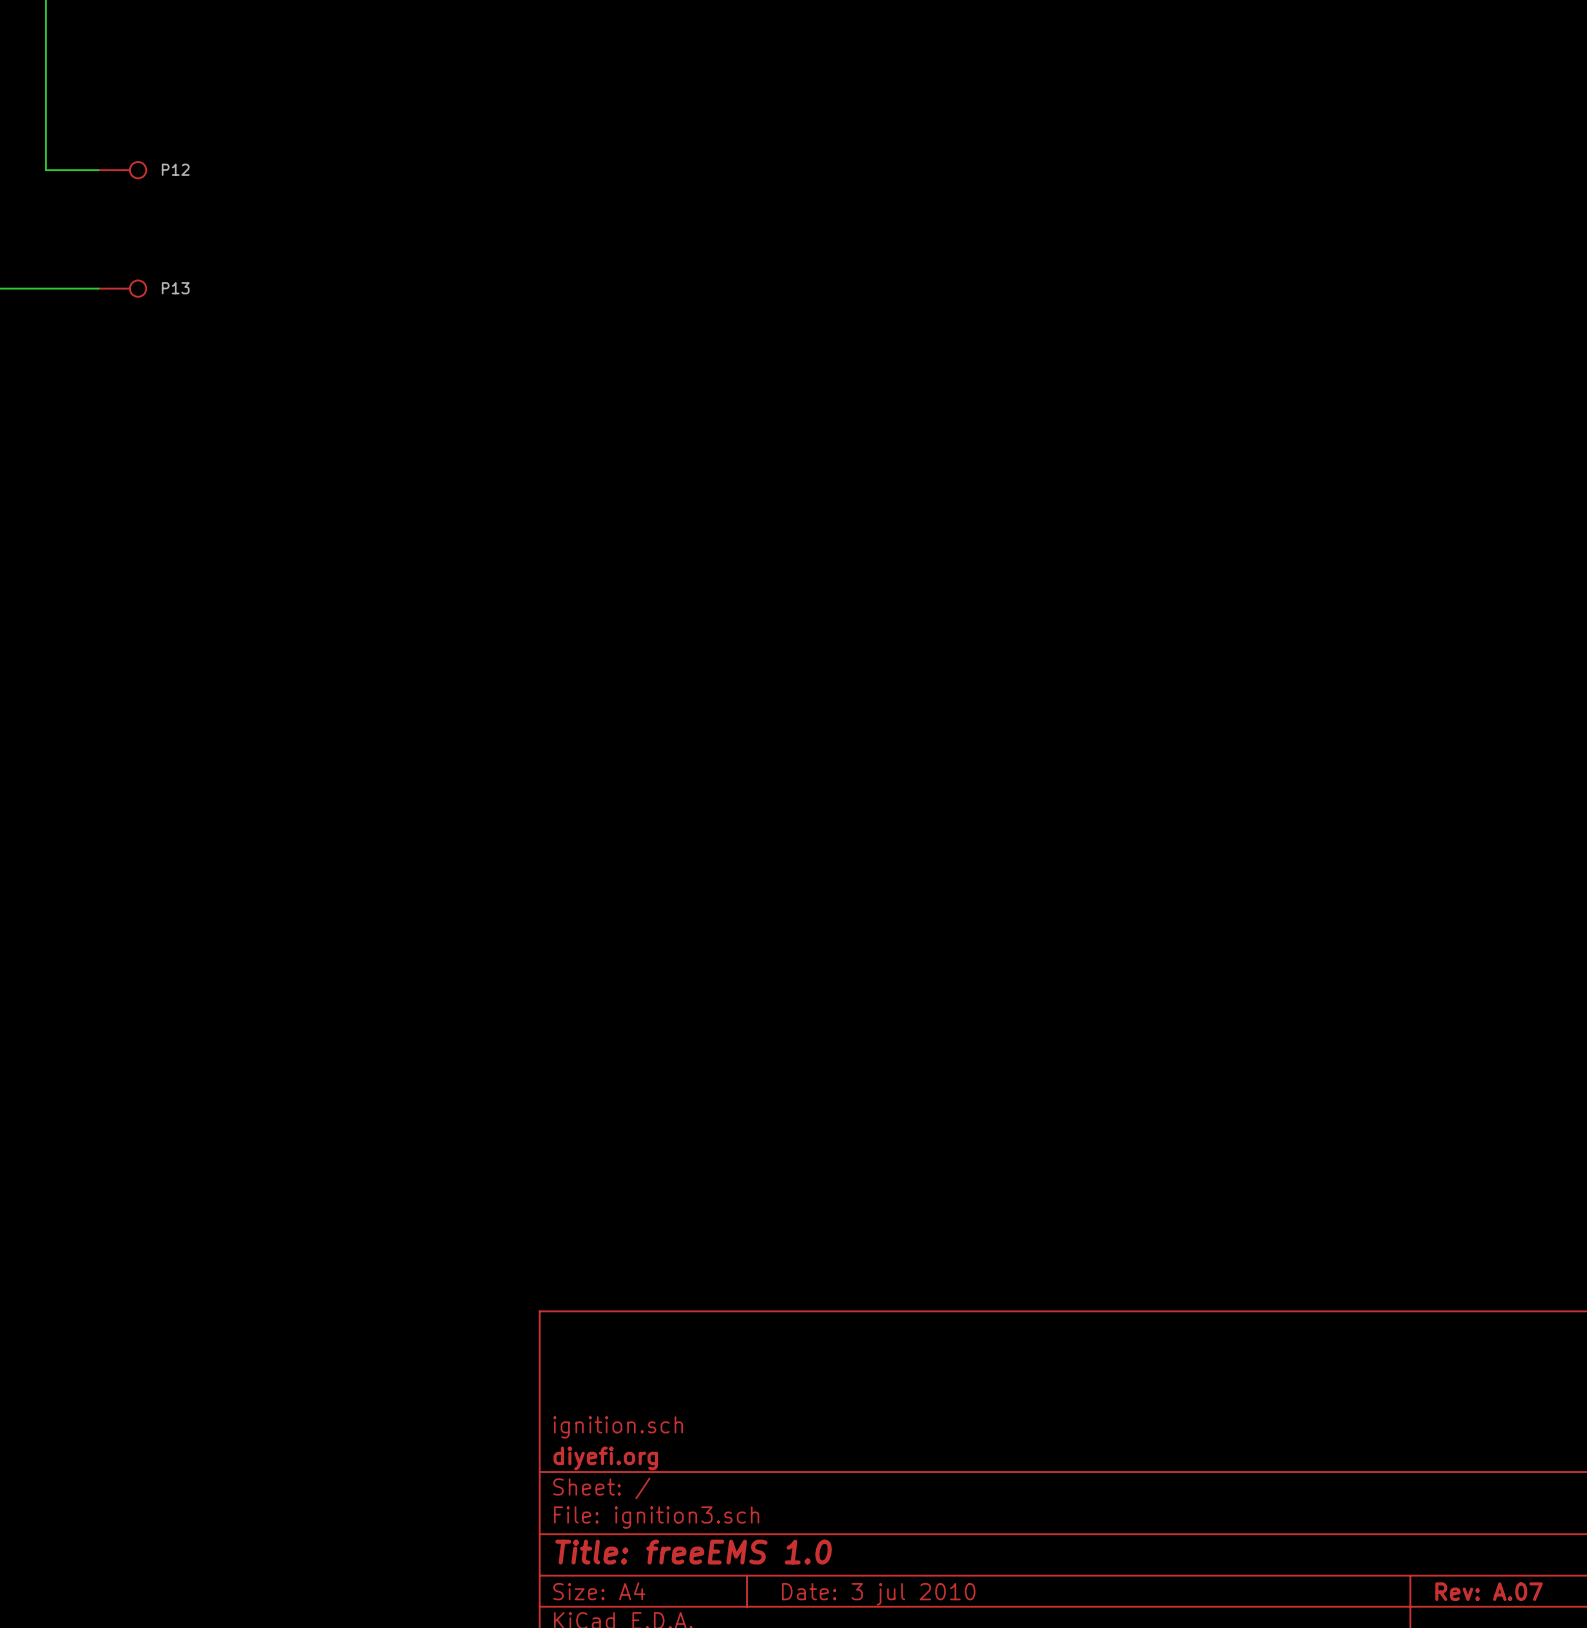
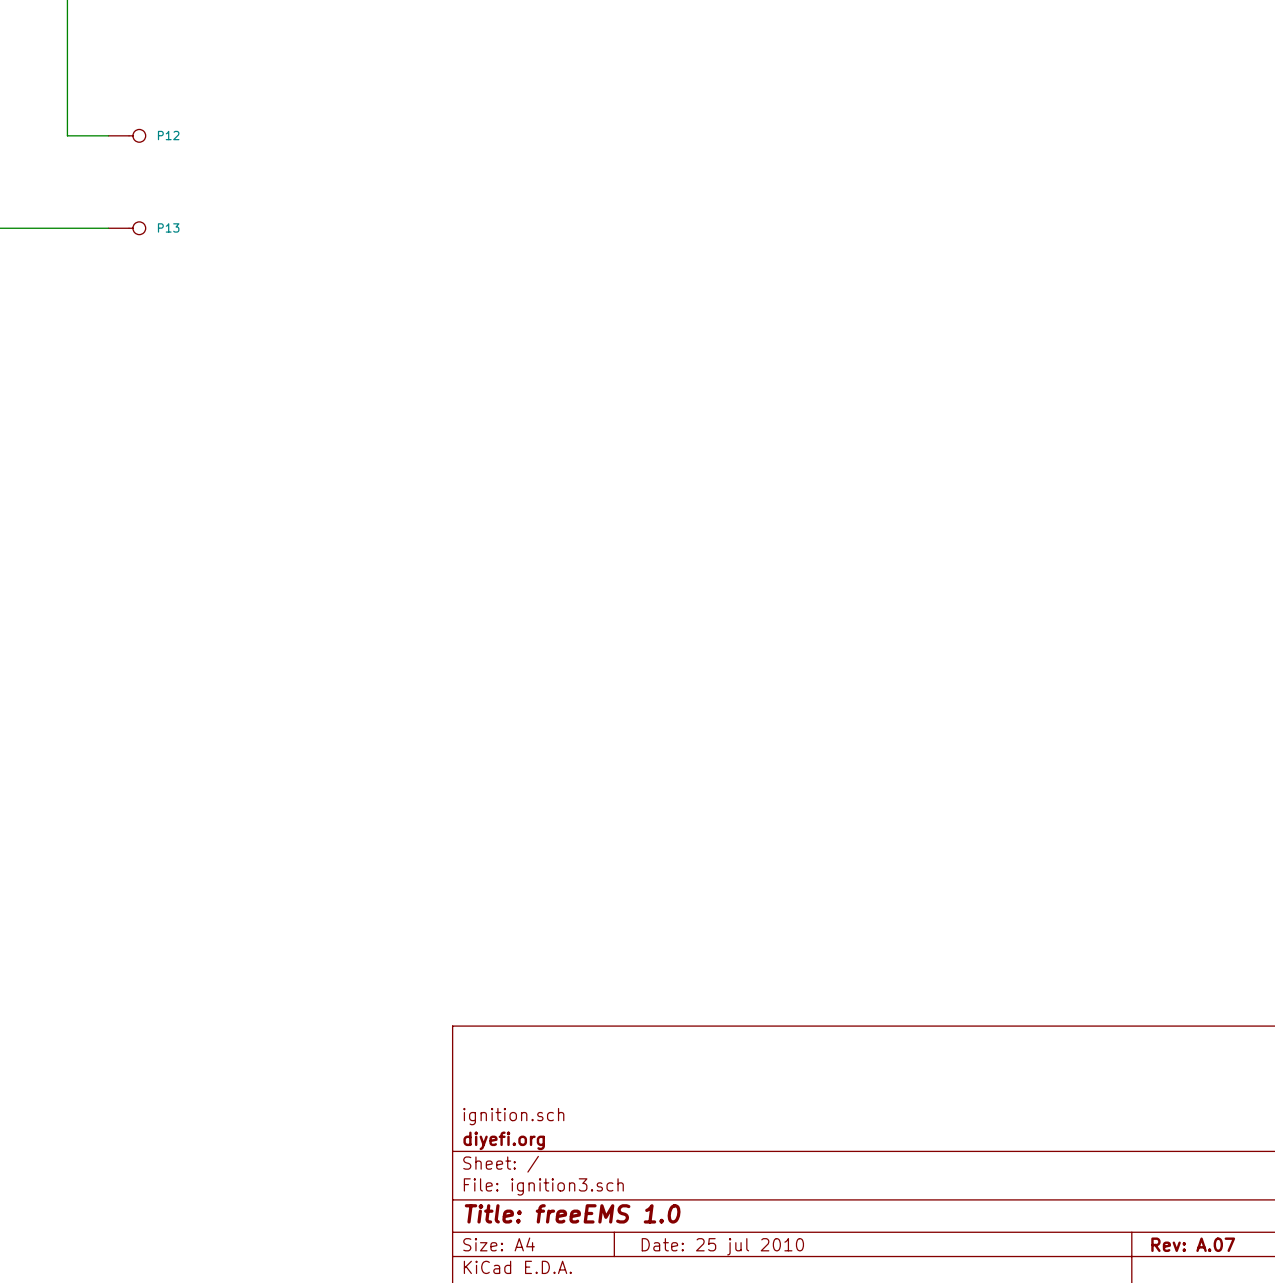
title block: Date: 3 jul 2010 (878, 1594) -> Date: 25 jul 2010 (722, 1246)

